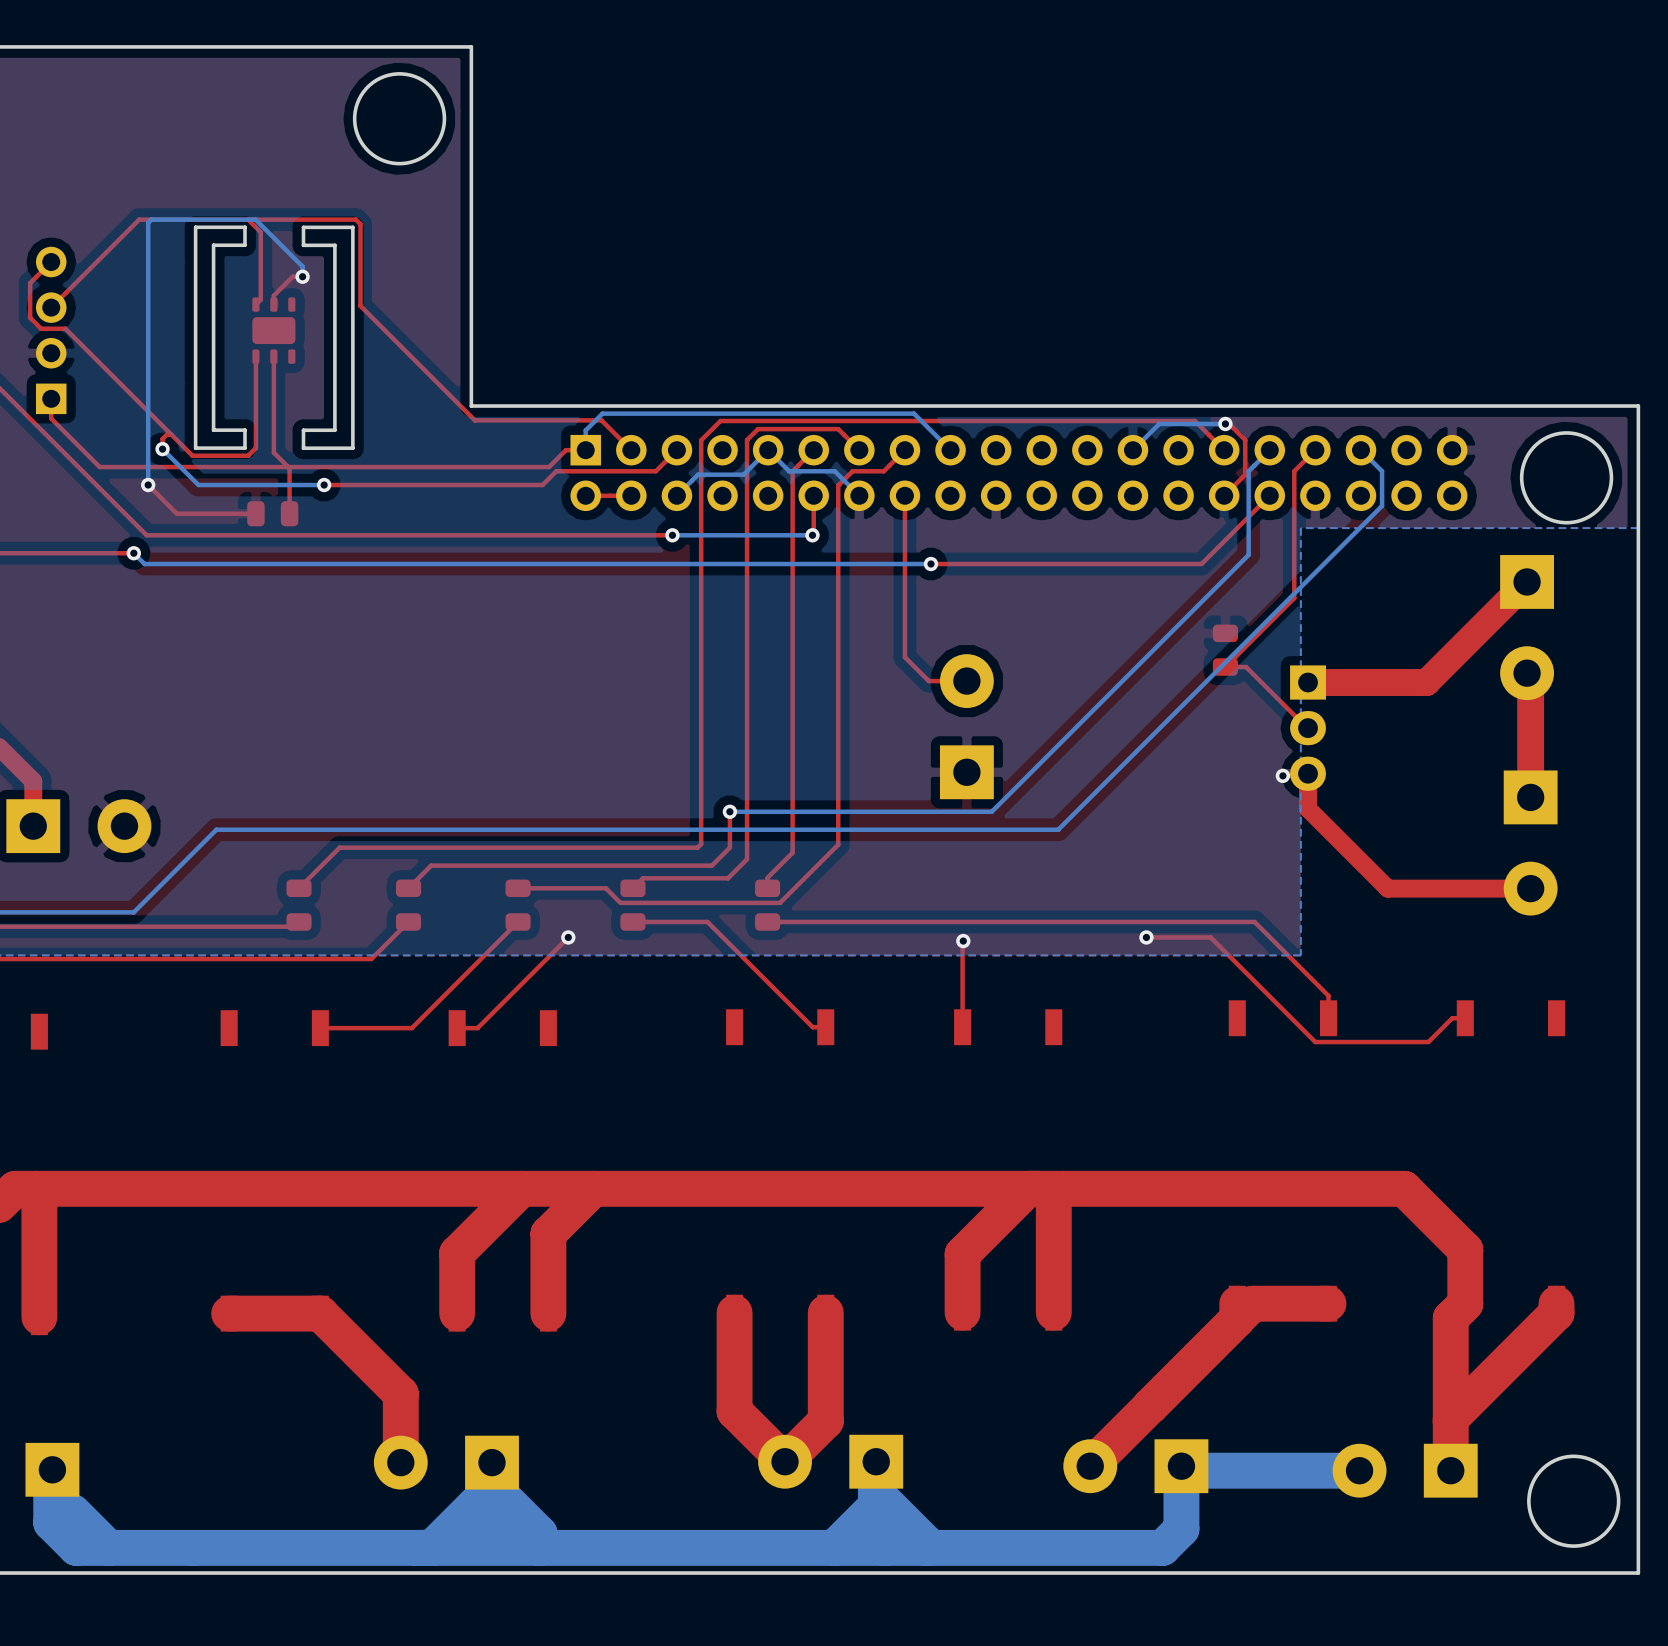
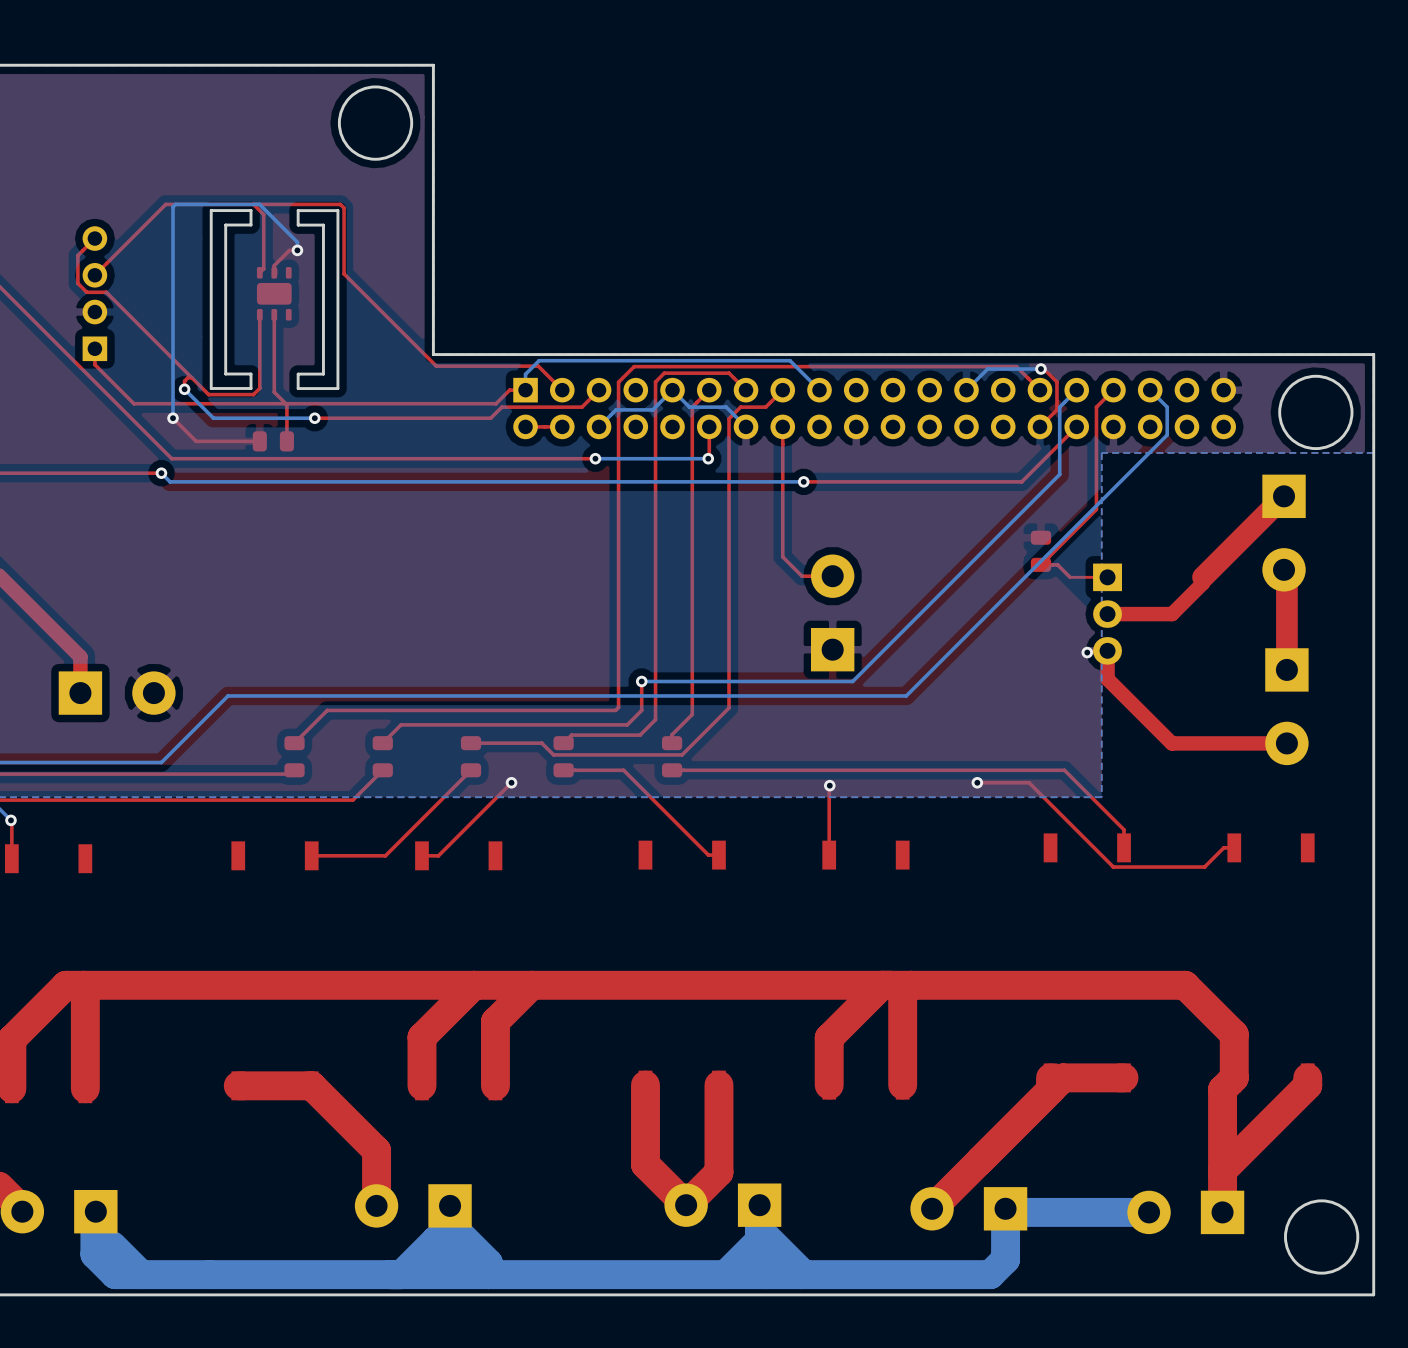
top track: (1261, 682) (1308, 728) -> (1070, 577) (1107, 577)
top track: (1426, 682) (1308, 682) -> (1203, 577) (1203, 583) (1172, 614) (1107, 614)

